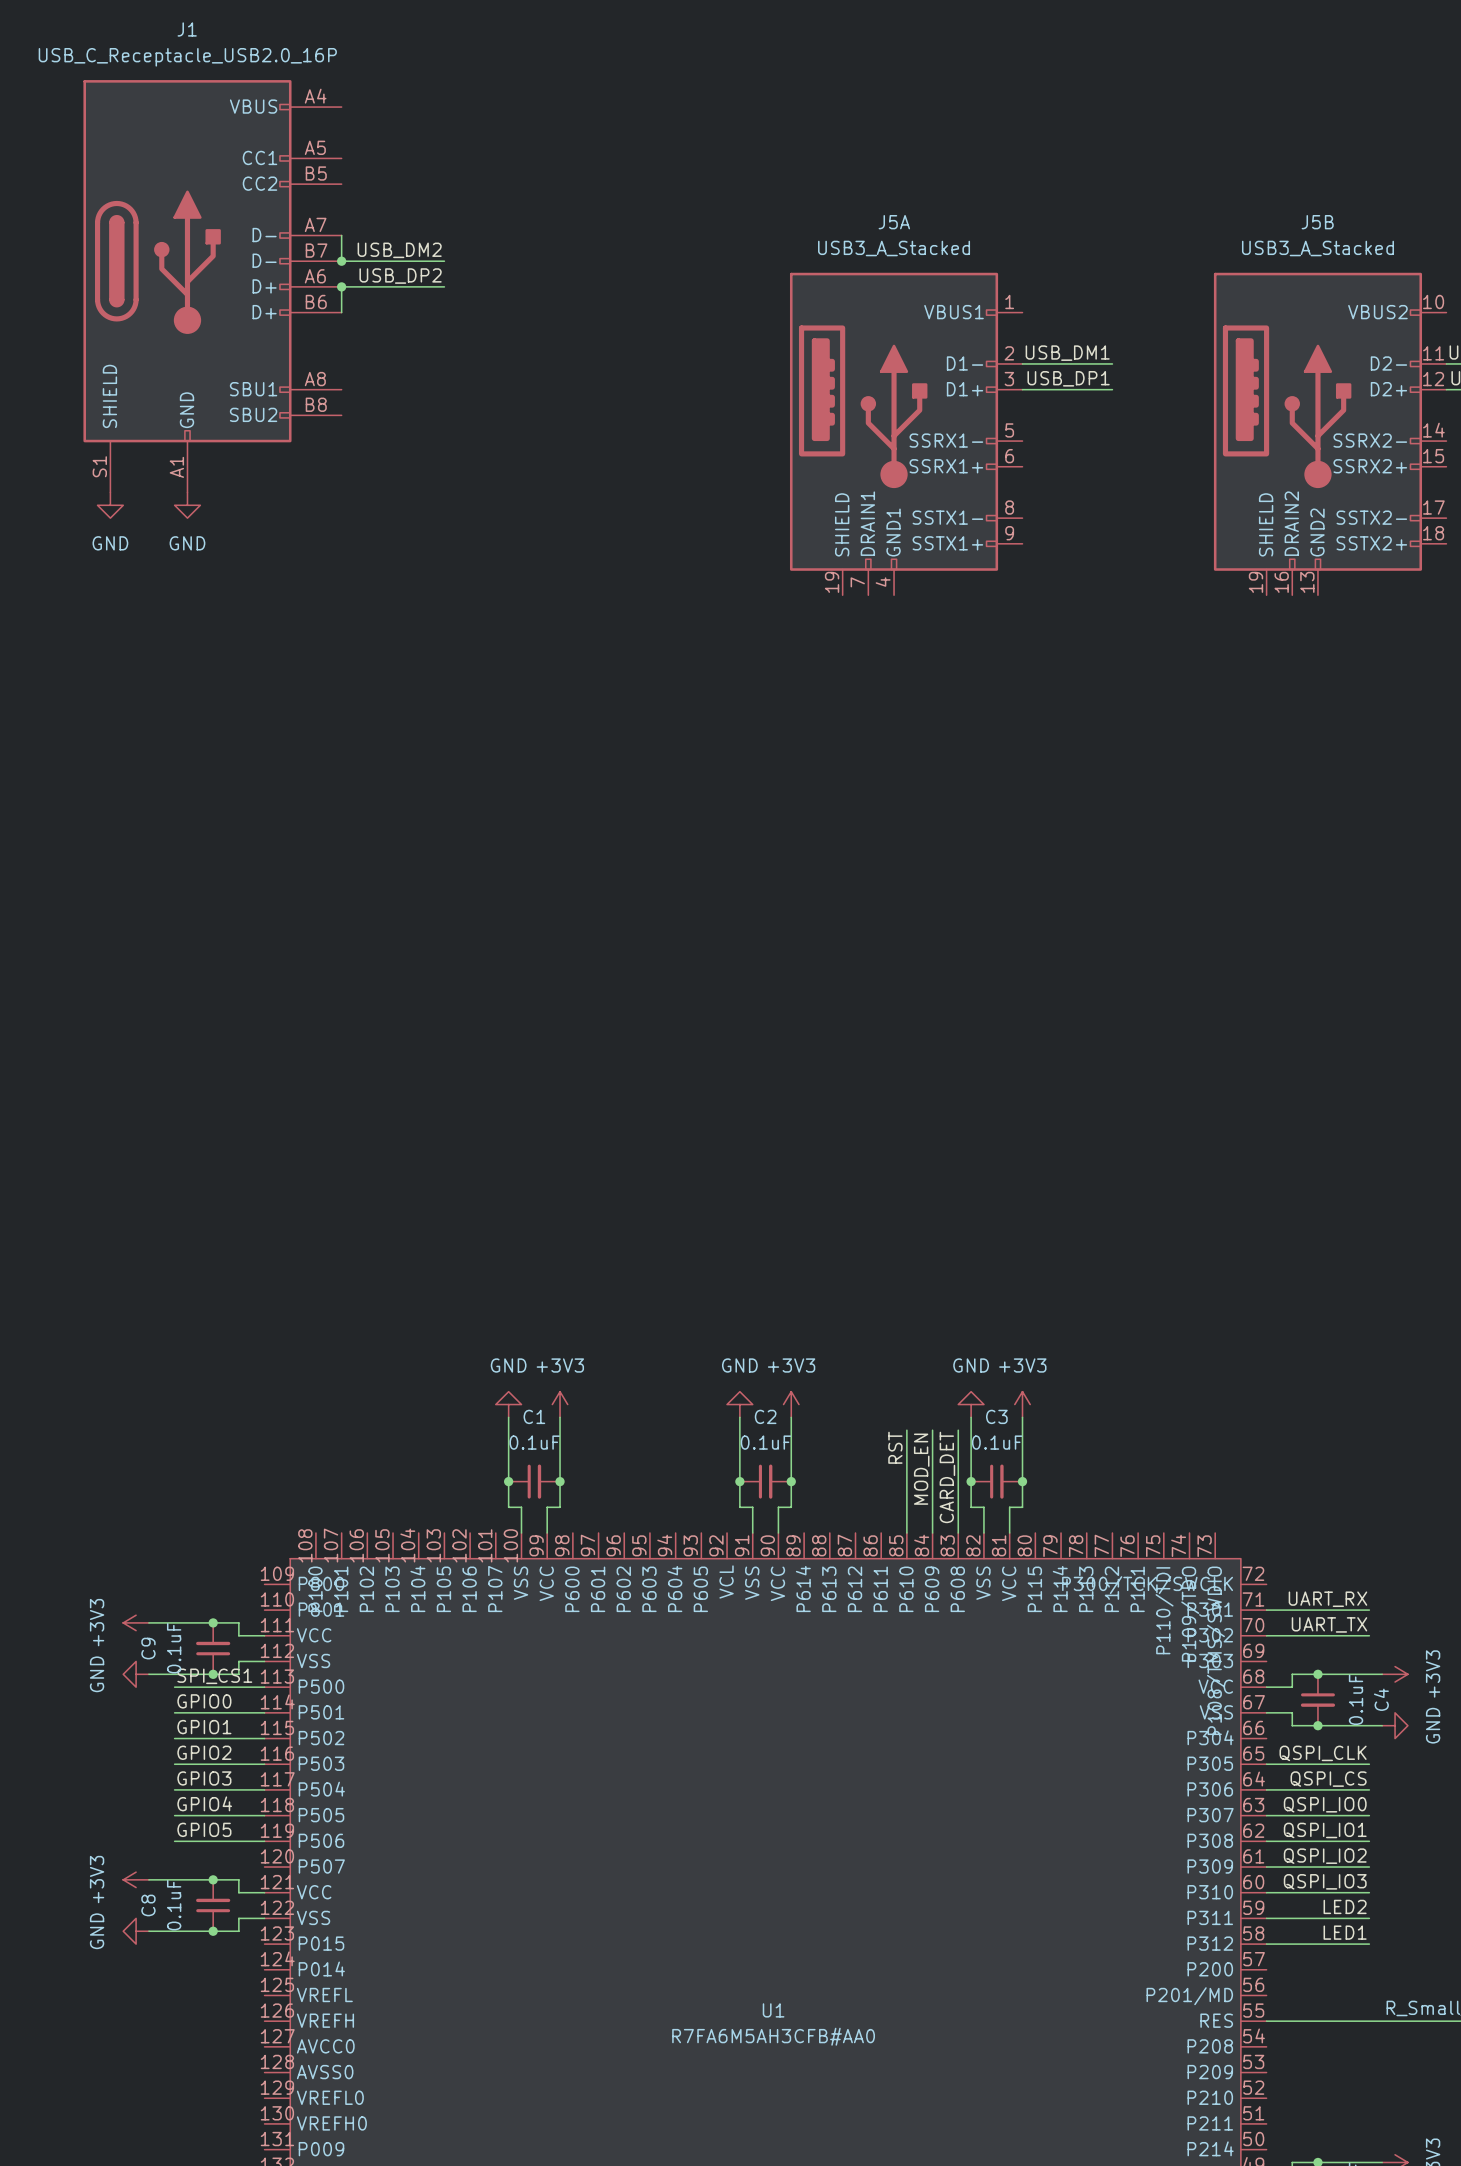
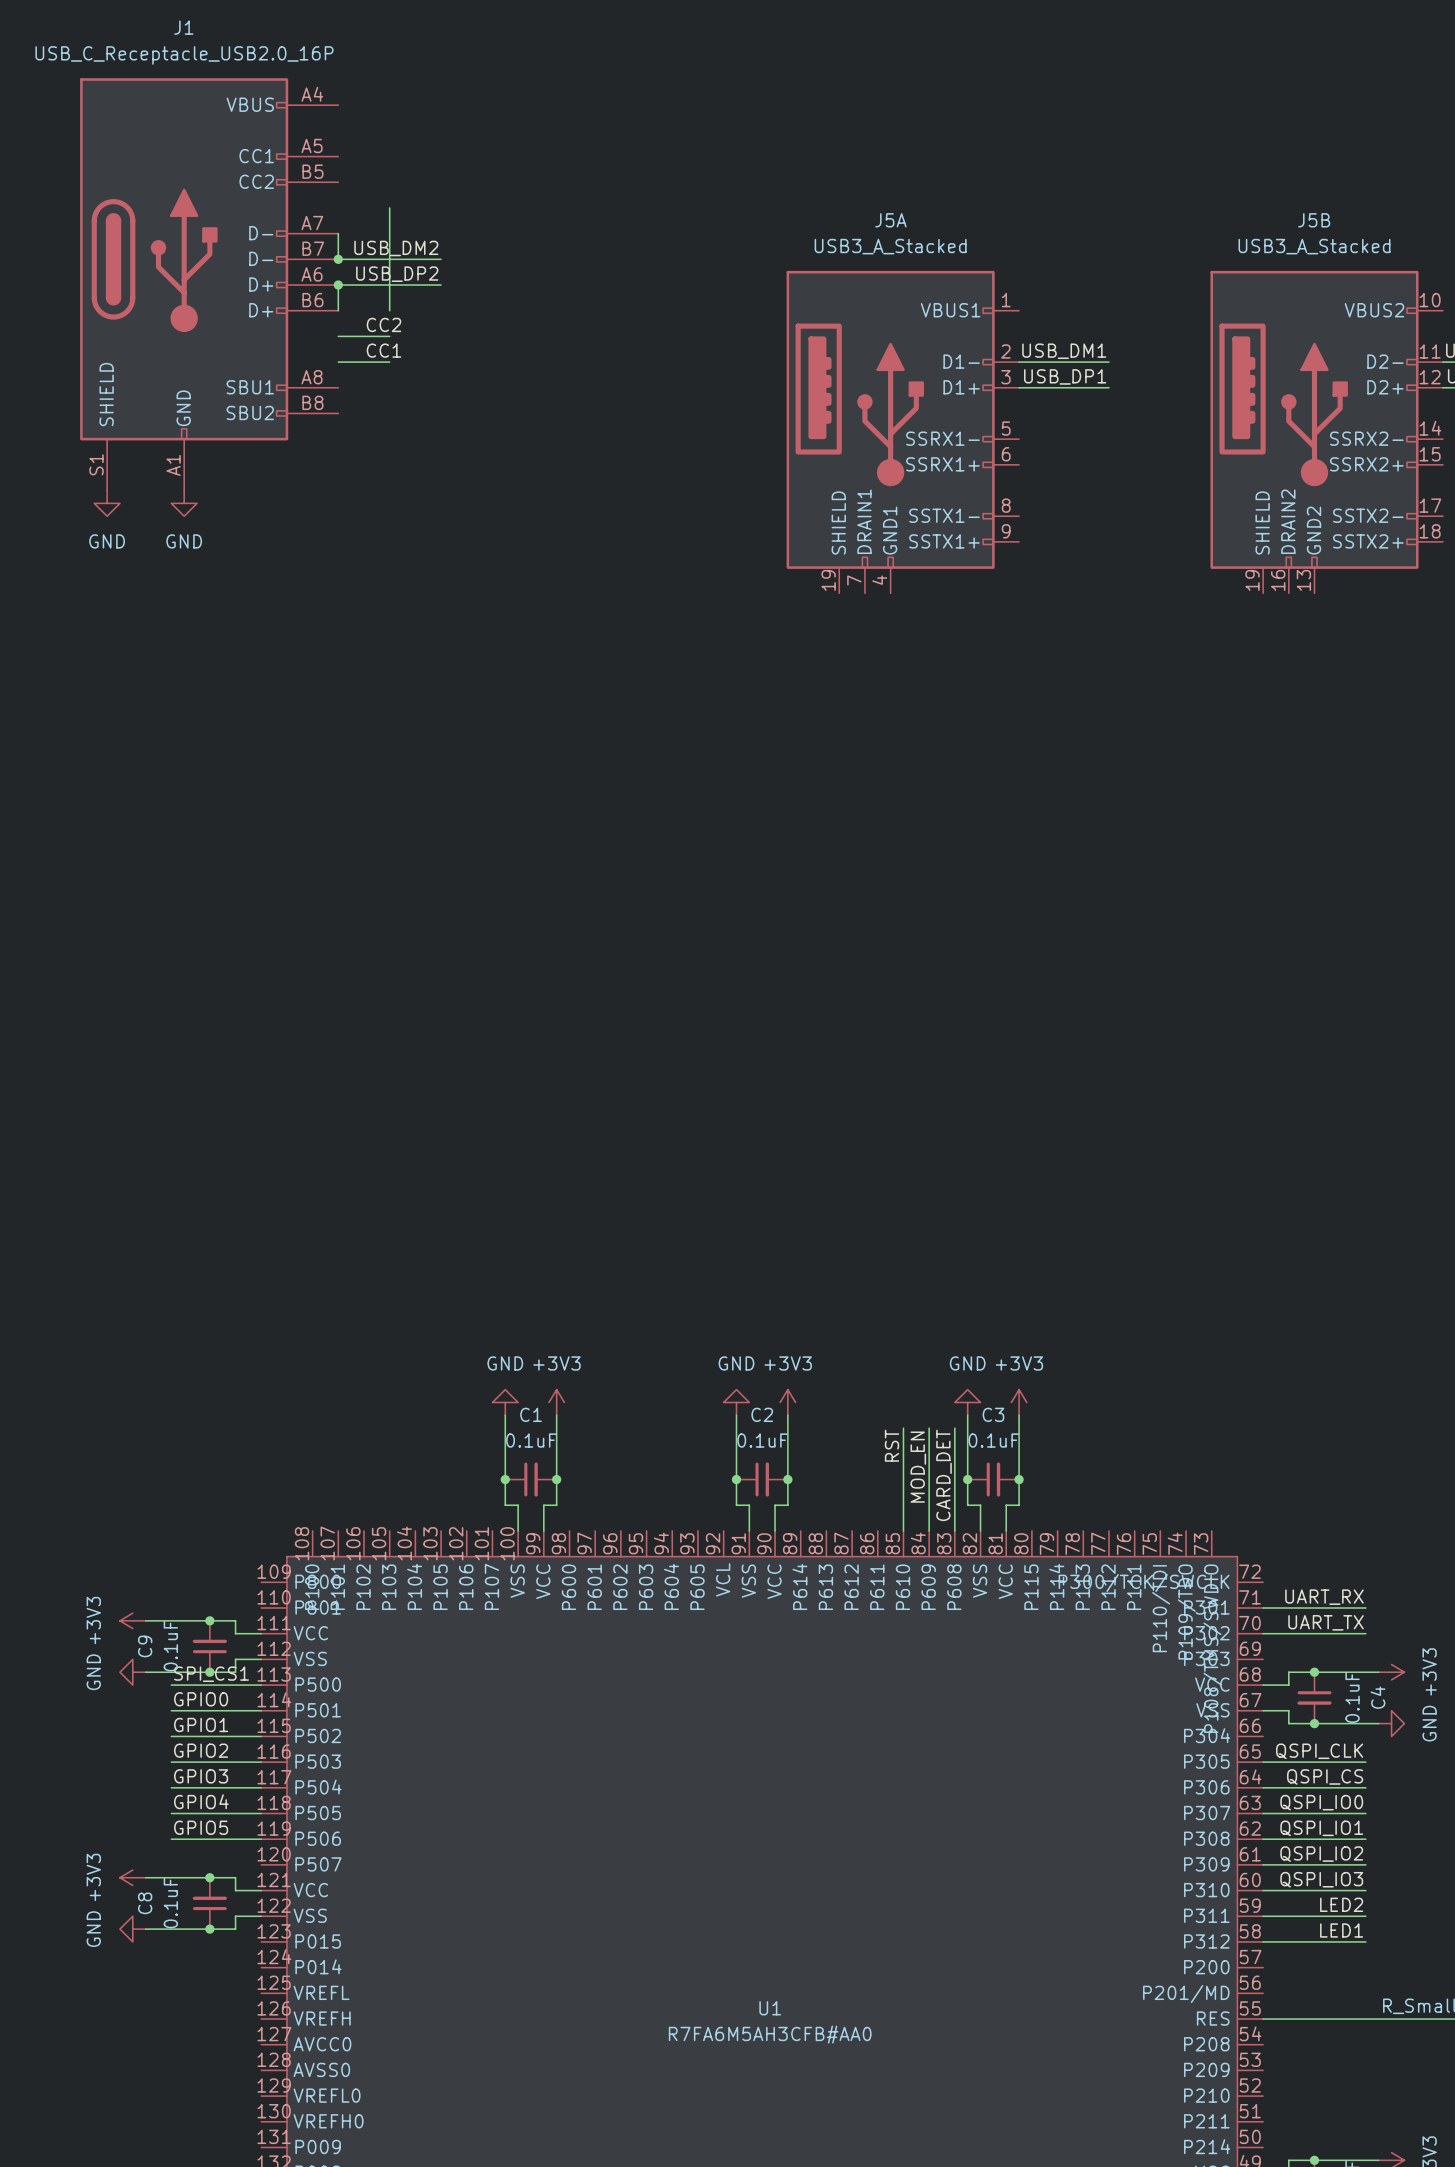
wire: none -> (389, 207) (389, 310)
label: none -> CC2 (383, 324)
wire: none -> (338, 336) (389, 336)
label: none -> CC1 (383, 350)
wire: none -> (338, 362) (389, 362)

